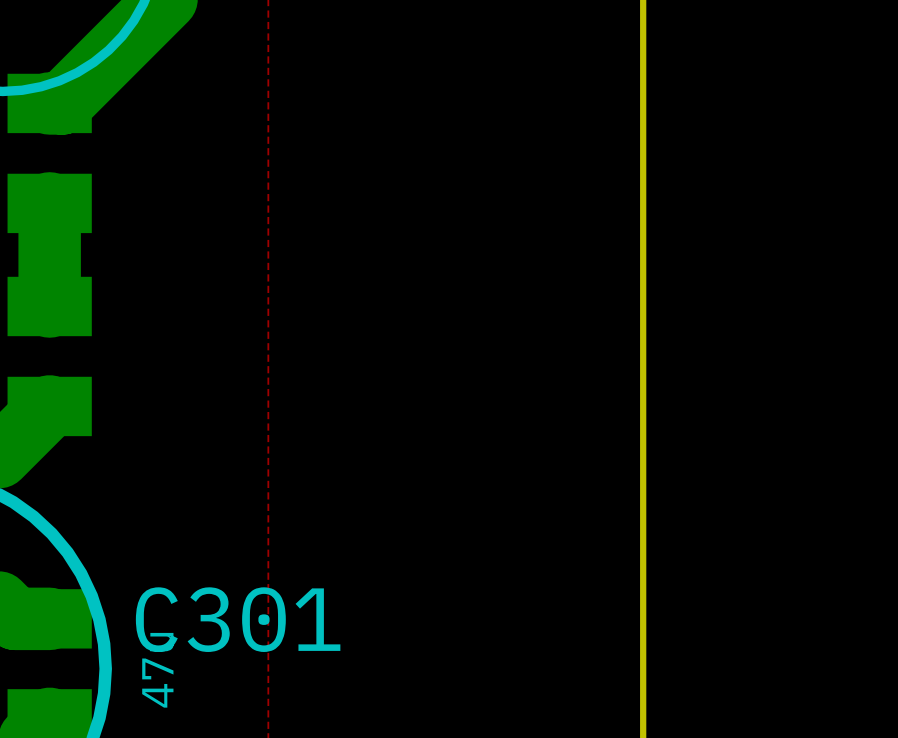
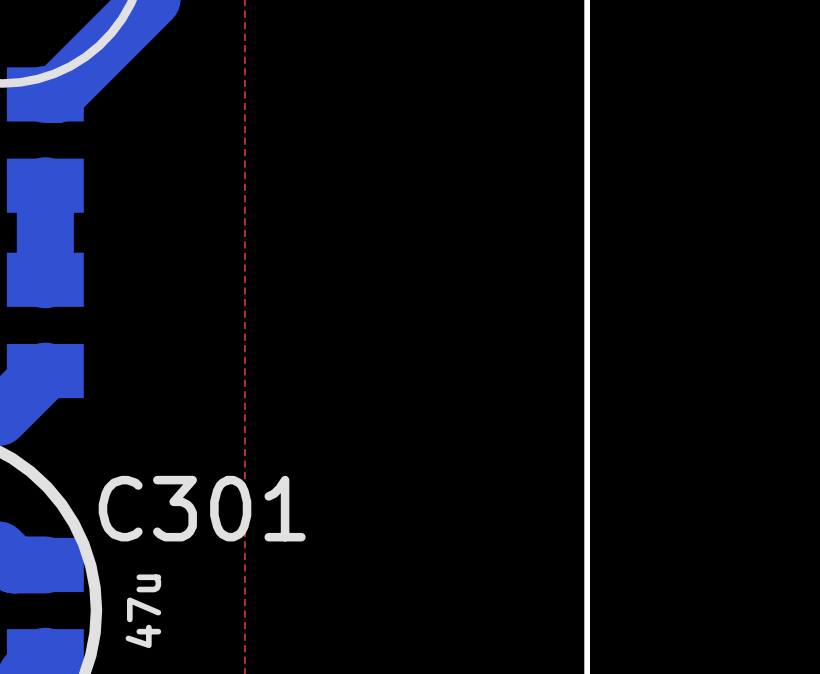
C301 name position: C301 (238, 619) -> C301 (202, 508)

